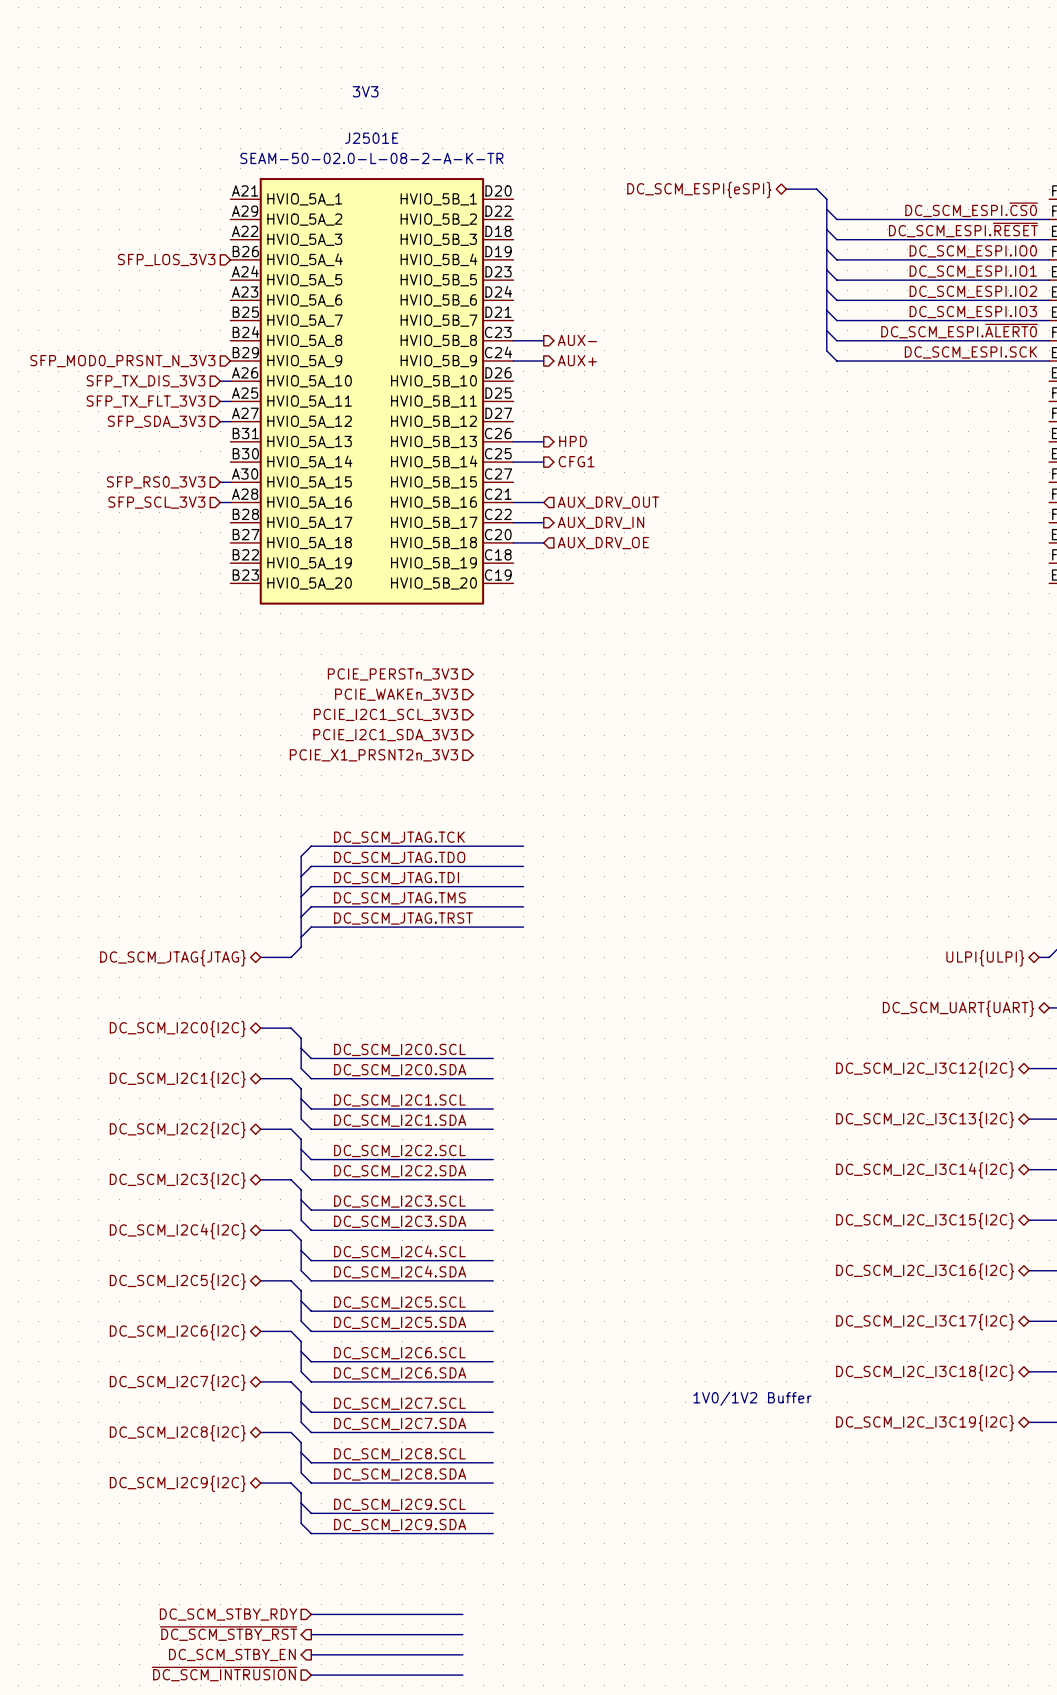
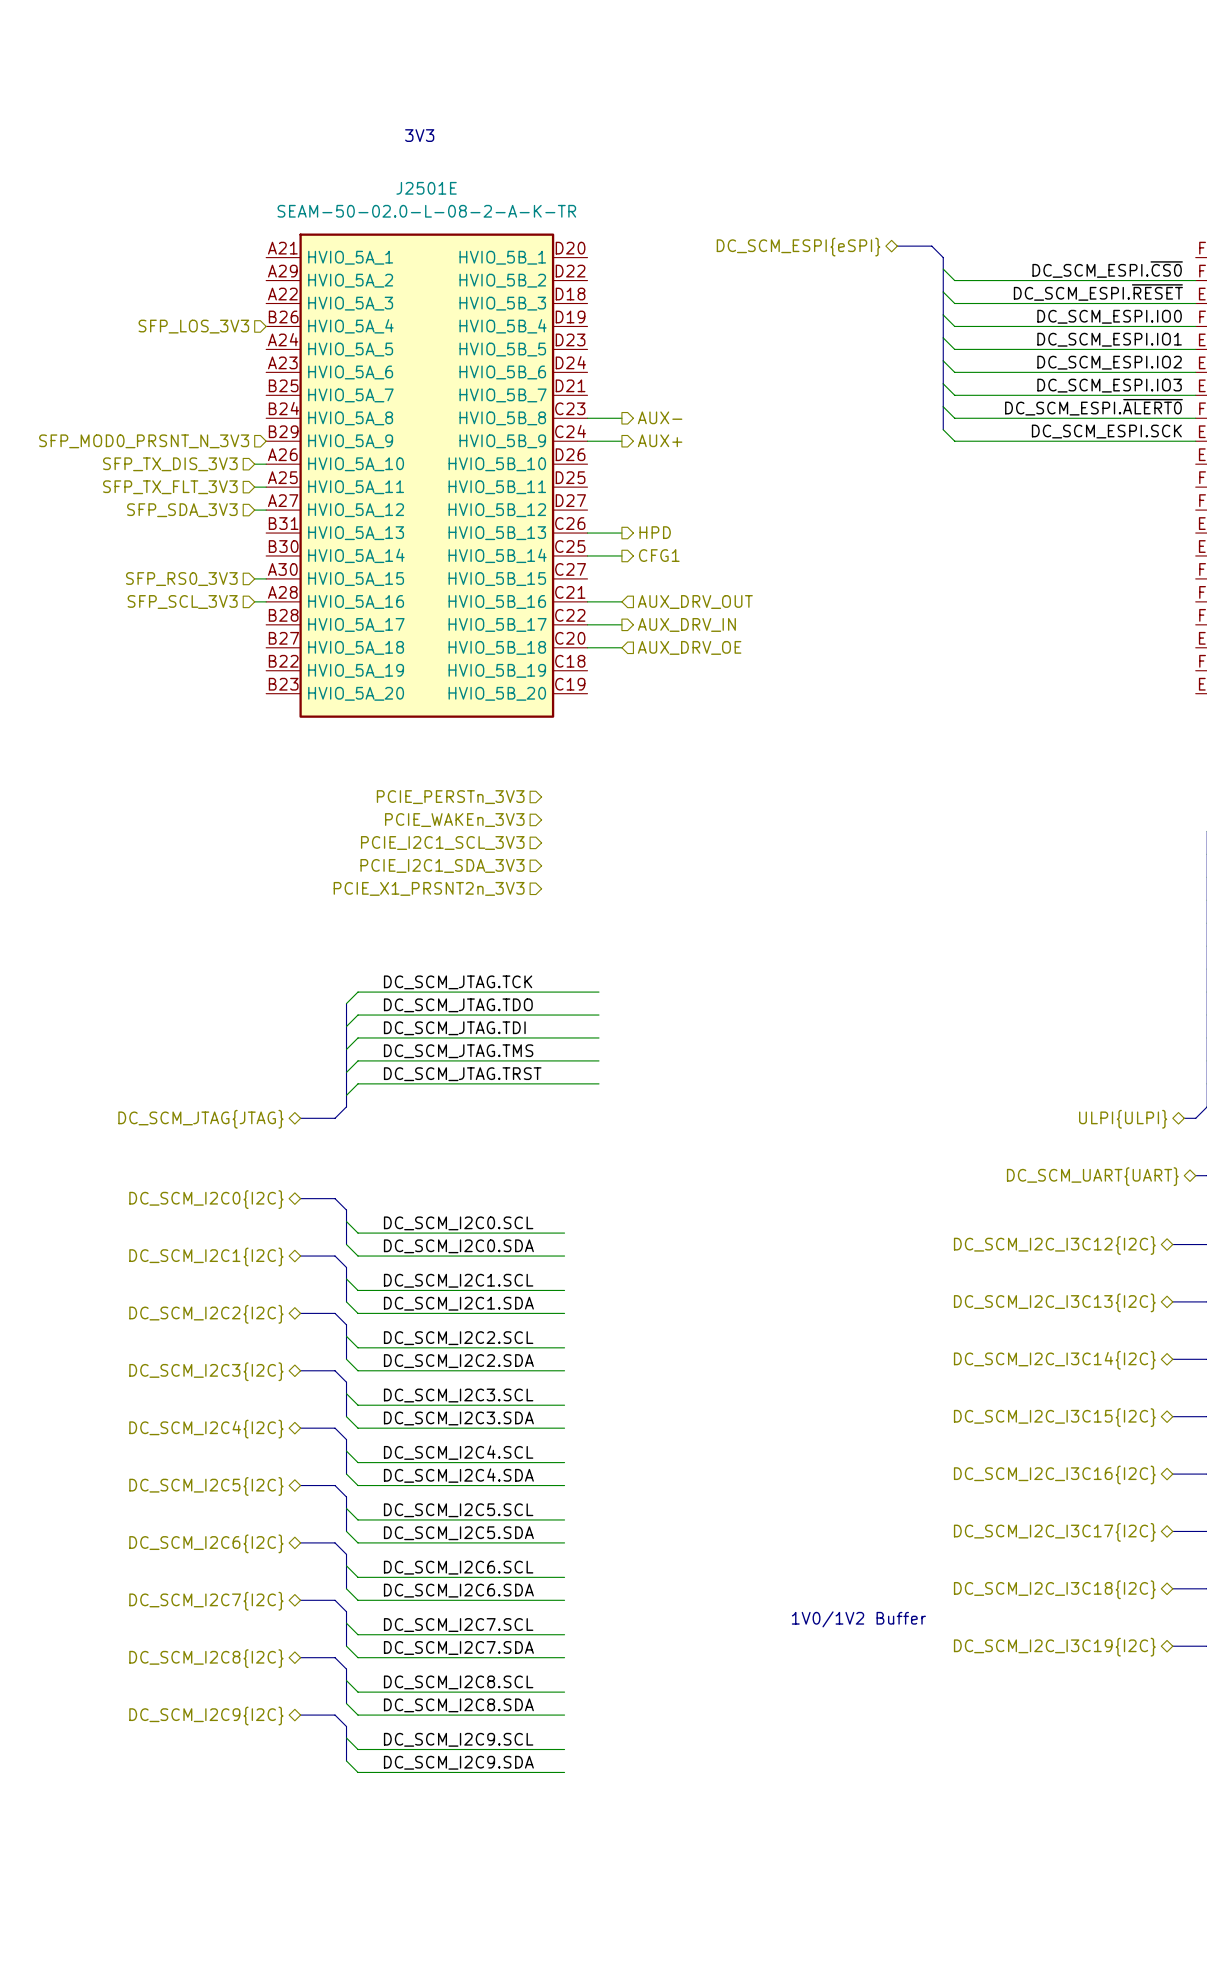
hierarchical label: DC_SCM_STBY_RDY (228, 1614) -> none
wire: (311, 1614) (462, 1614) -> none
hierarchical label: ~{DC_SCM_STBY_RST} (228, 1633) -> none
wire: (311, 1634) (462, 1634) -> none
hierarchical label: DC_SCM_STBY_EN (232, 1654) -> none
wire: (311, 1654) (462, 1654) -> none
hierarchical label: ~{DC_SCM_INTRUSION} (224, 1674) -> none
wire: (311, 1675) (462, 1675) -> none

